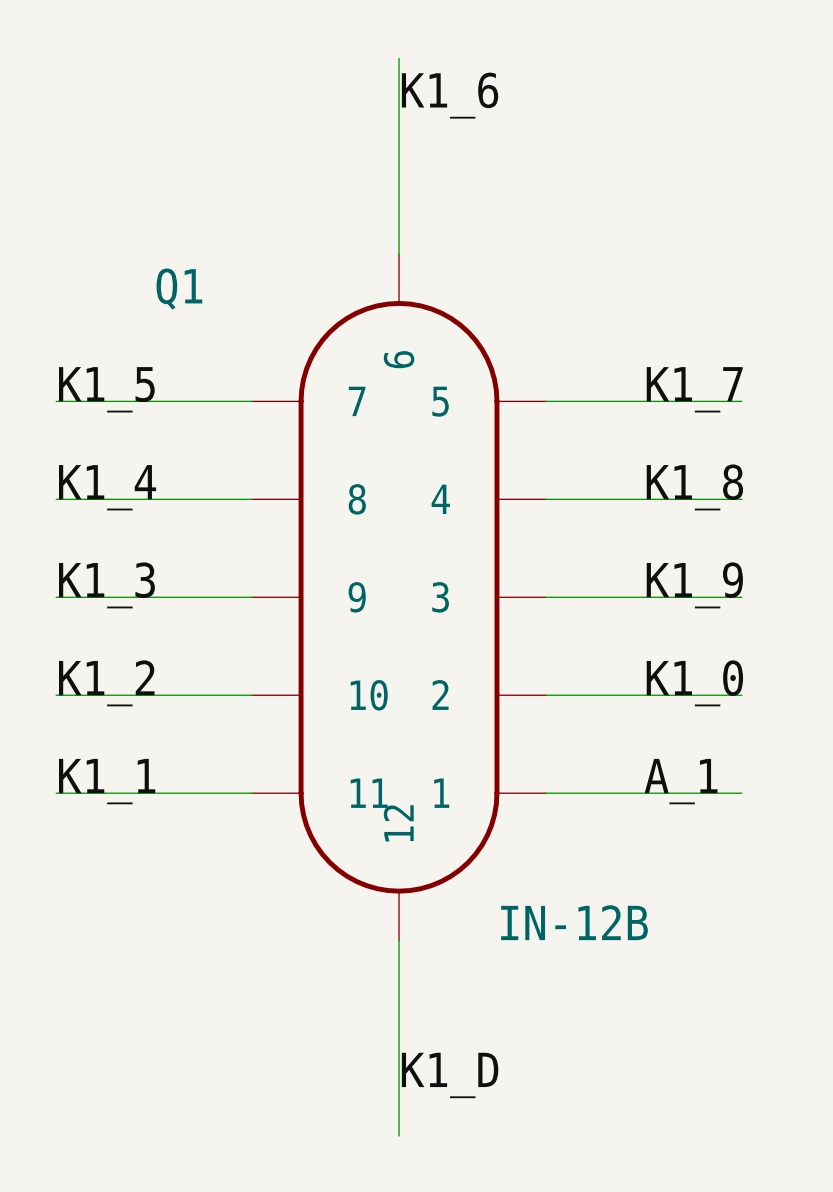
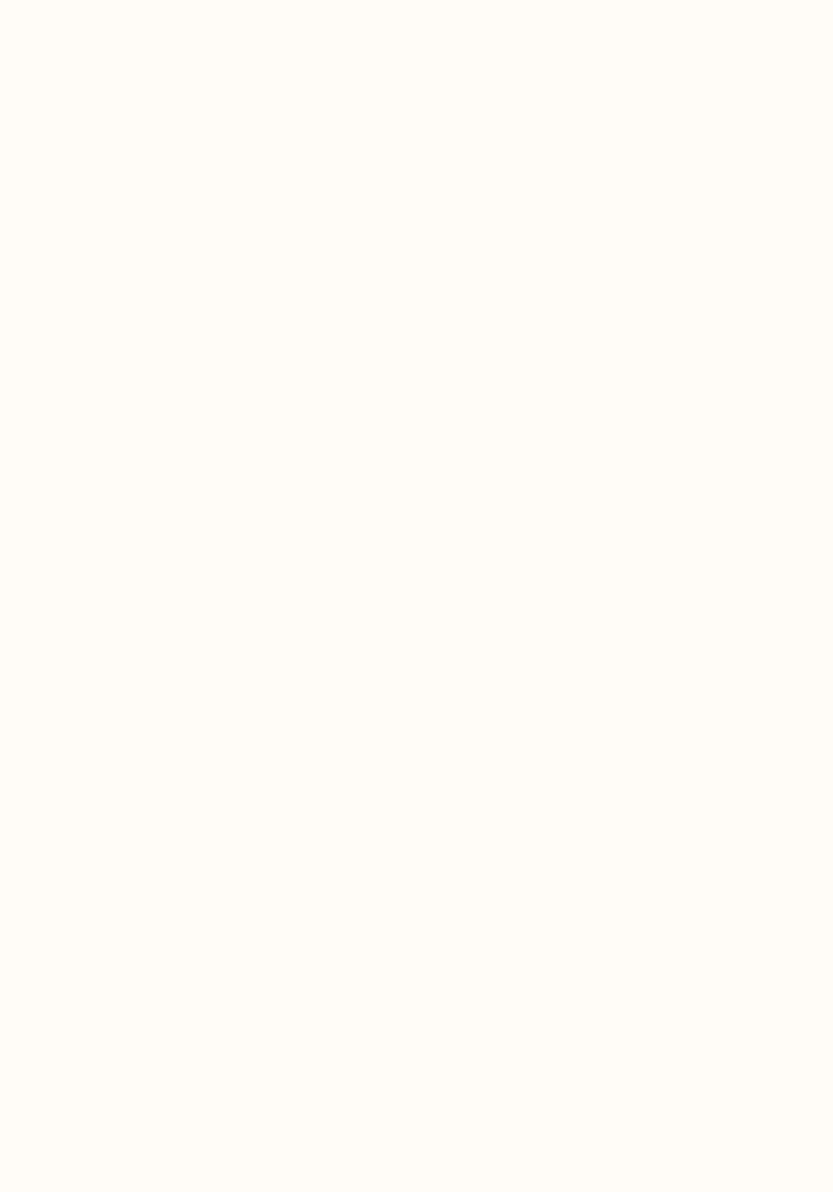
wire: (399, 58) (399, 254) -> none
label: K1_6 (450, 95) -> none
label: K1_5 (106, 389) -> none
label: K1_7 (694, 389) -> none
wire: (56, 401) (252, 401) -> none
wire: (545, 401) (741, 401) -> none
label: K1_4 (107, 487) -> none
label: K1_8 (694, 487) -> none
wire: (56, 499) (252, 499) -> none
wire: (545, 499) (741, 499) -> none
label: K1_3 (106, 585) -> none
label: K1_9 (694, 585) -> none
wire: (56, 597) (252, 597) -> none
Q1: IN-12B (399, 597) -> none
wire: (545, 597) (741, 597) -> none
label: K1_2 (106, 683) -> none
label: K1_0 (694, 683) -> none
wire: (56, 695) (252, 695) -> none
wire: (545, 695) (741, 695) -> none
label: K1_1 (107, 781) -> none
label: A_1 (681, 781) -> none
wire: (56, 793) (252, 793) -> none
wire: (545, 793) (741, 793) -> none
wire: (399, 940) (399, 1136) -> none
label: K1_D (450, 1075) -> none

